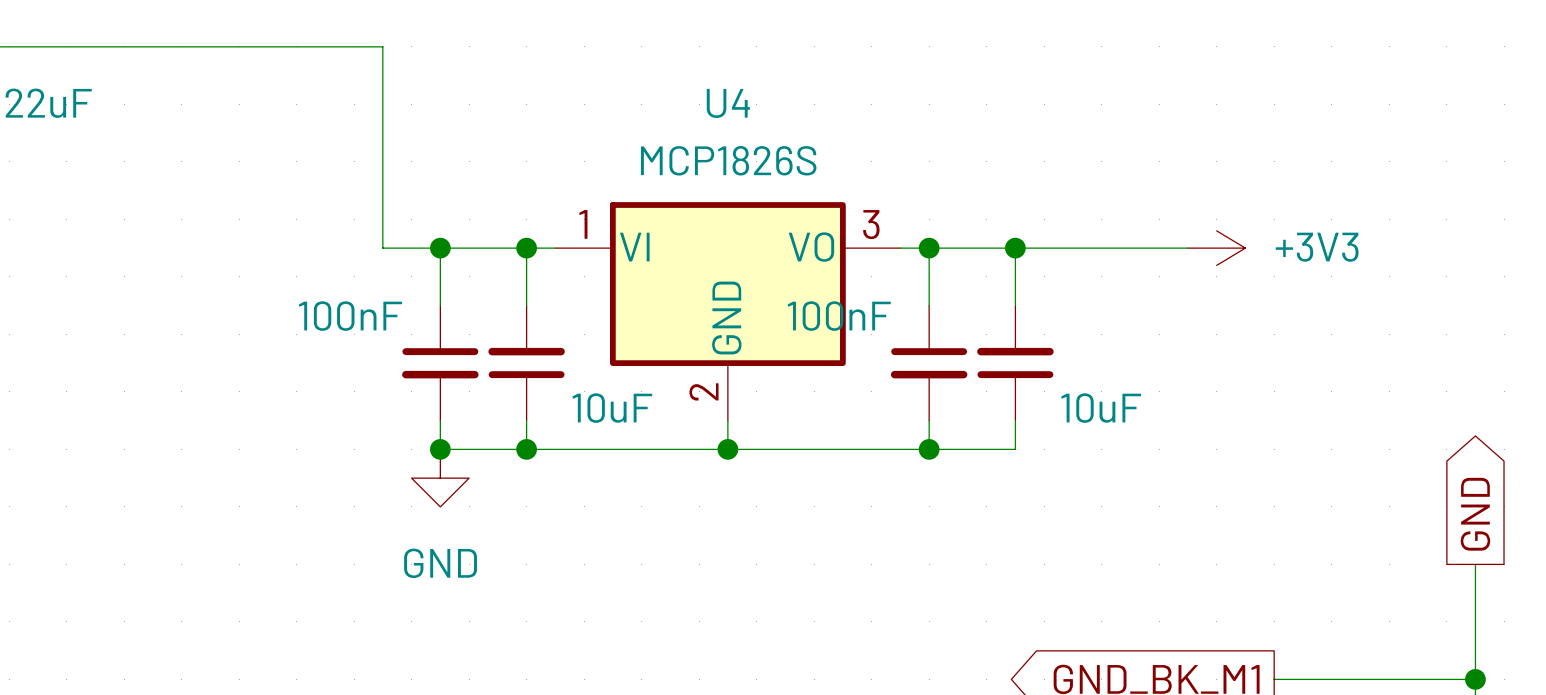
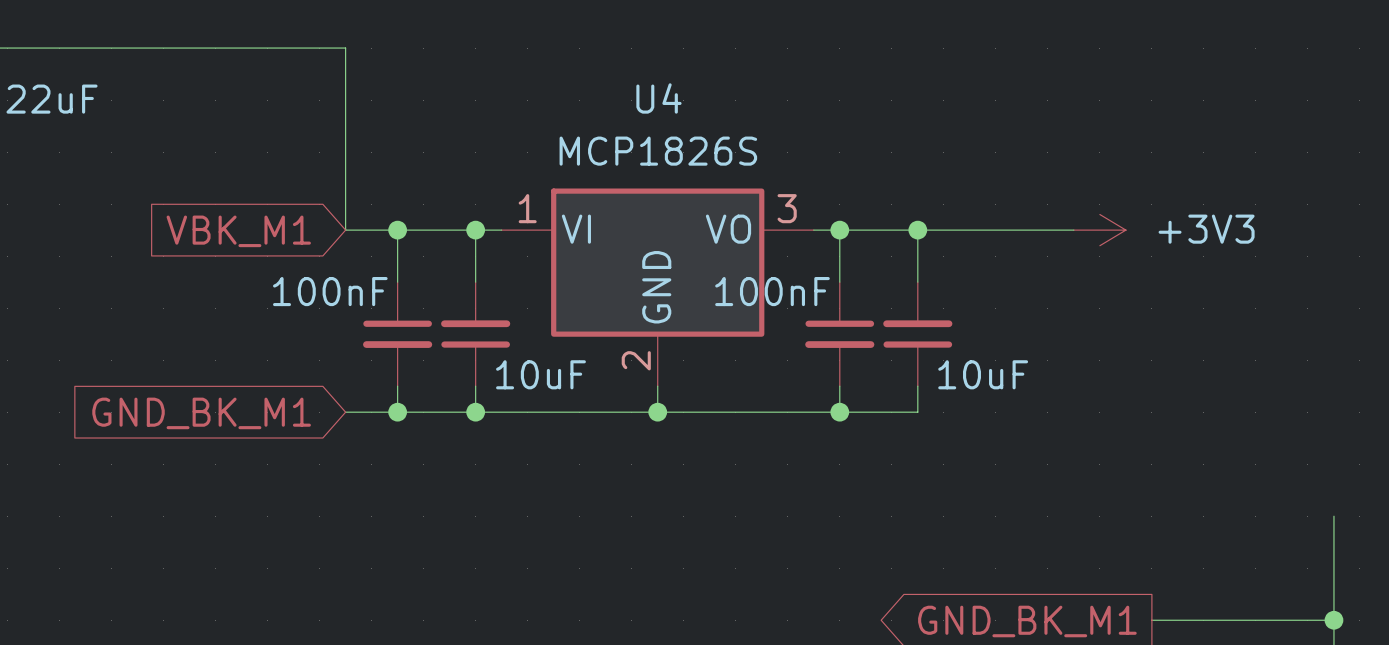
global label: none -> VBK_M1 (238, 231)
global label: none -> GND_BK_M1 (201, 413)
wire: none -> (345, 412) (397, 412)
power symbol: GND (440, 478) -> none
global label: GND (1475, 514) -> none

